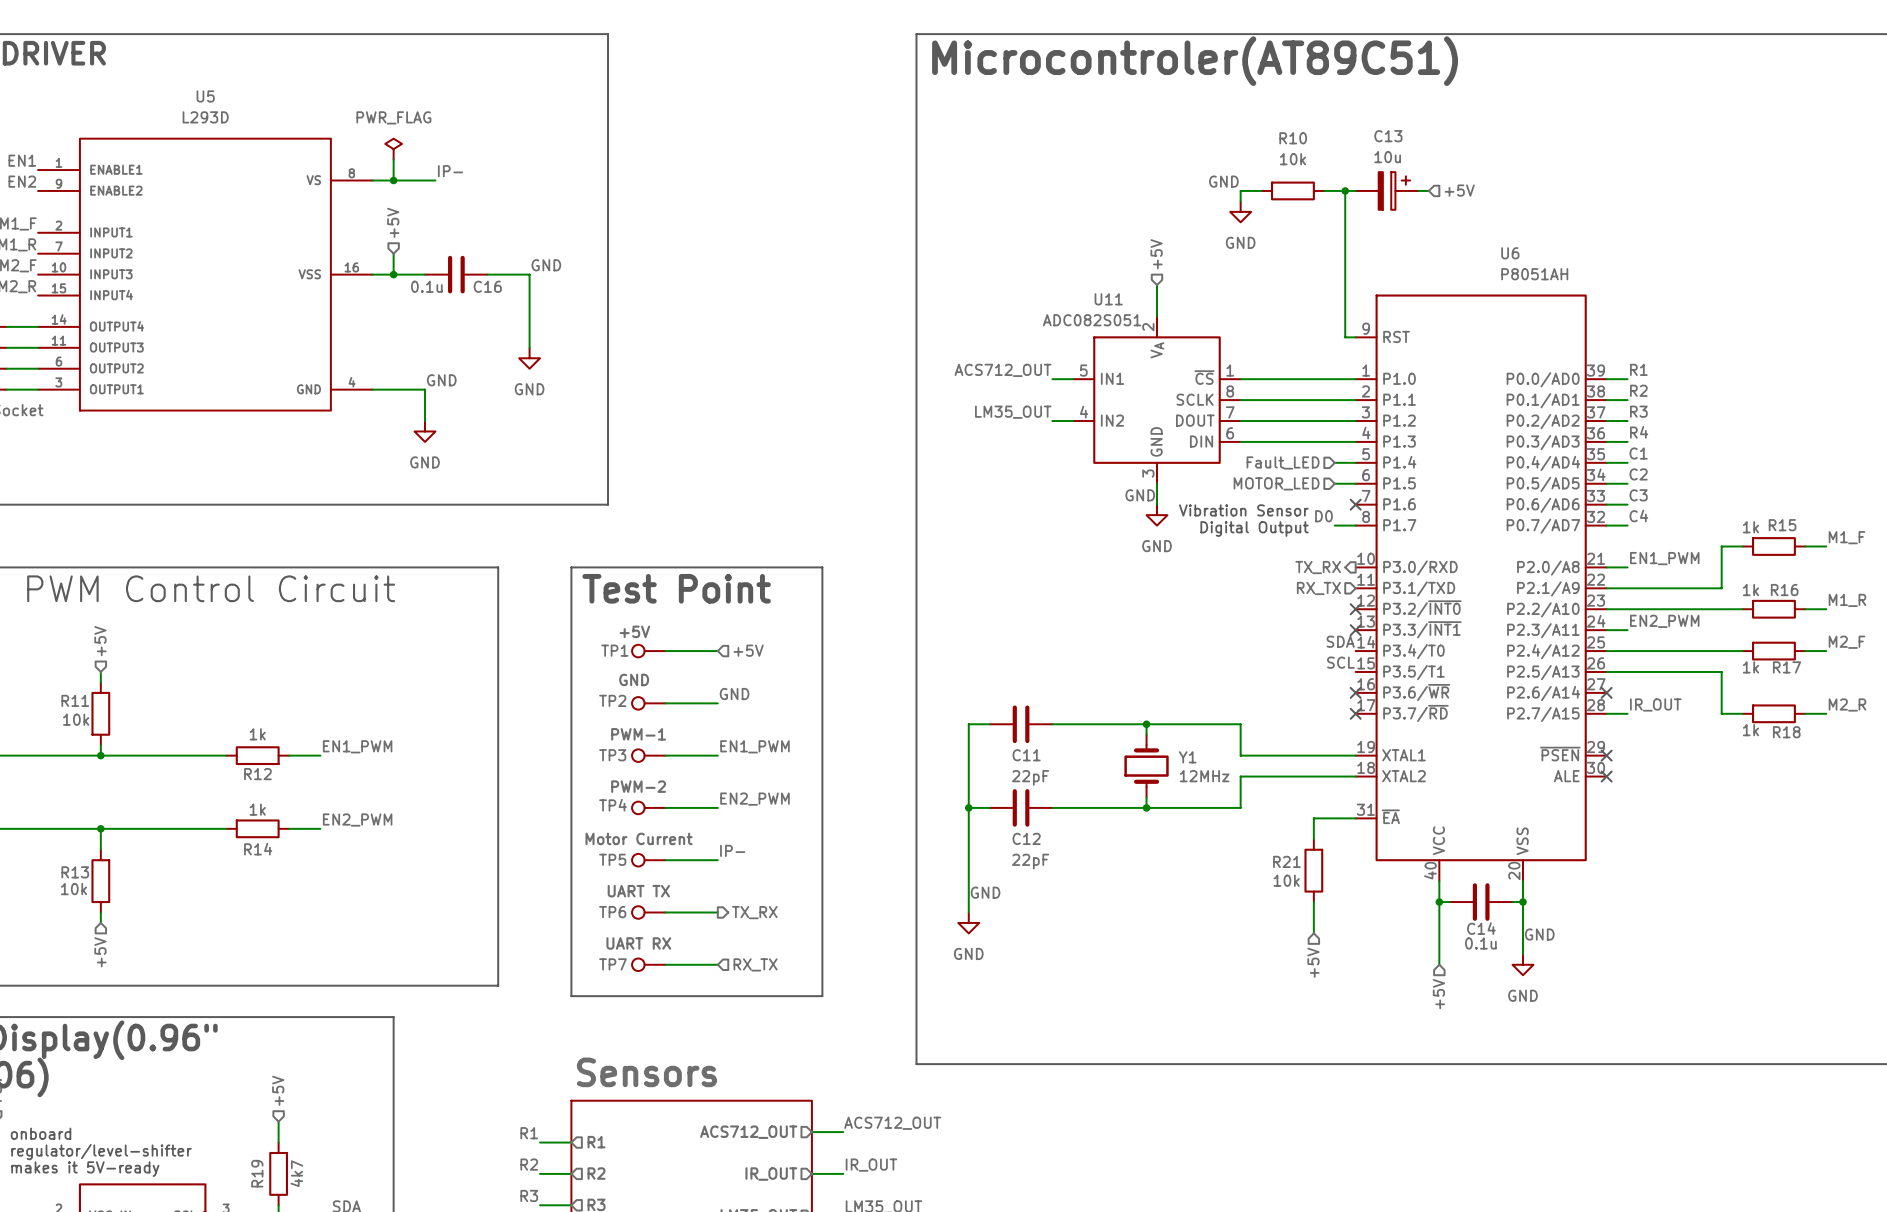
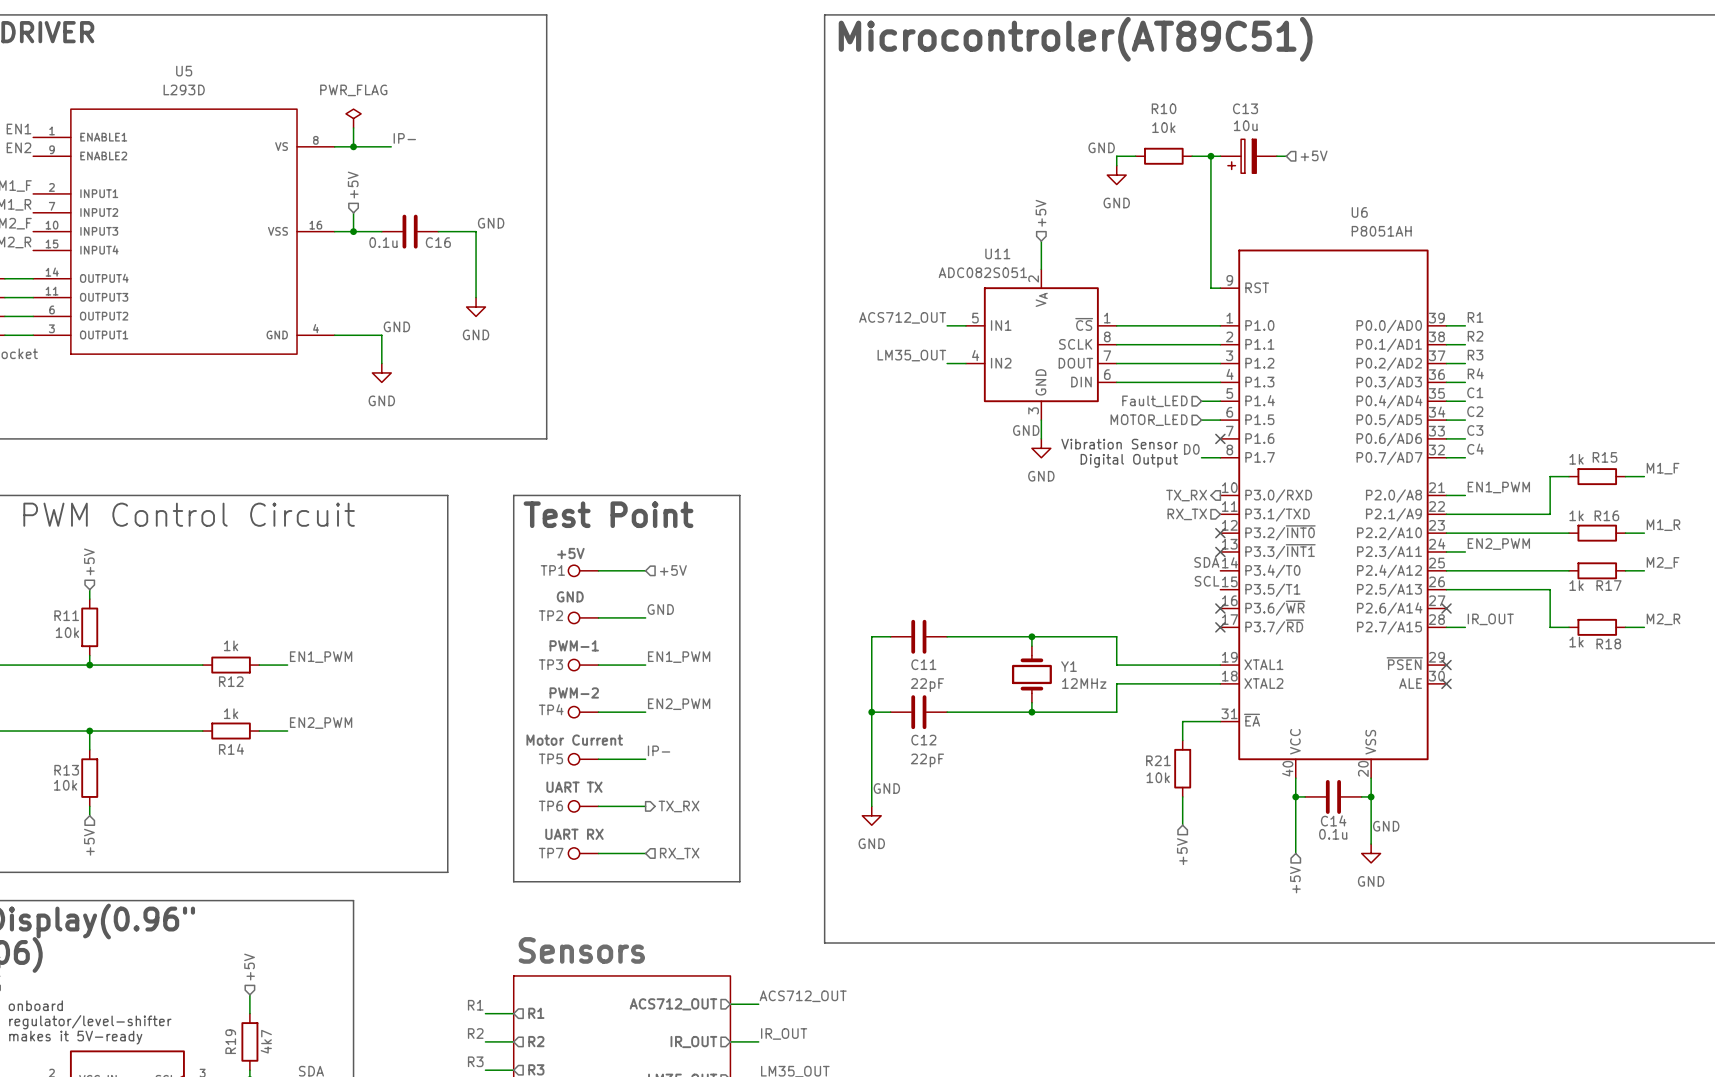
C13 rotation: 0° (1394, 190) -> 180° (1242, 156)

